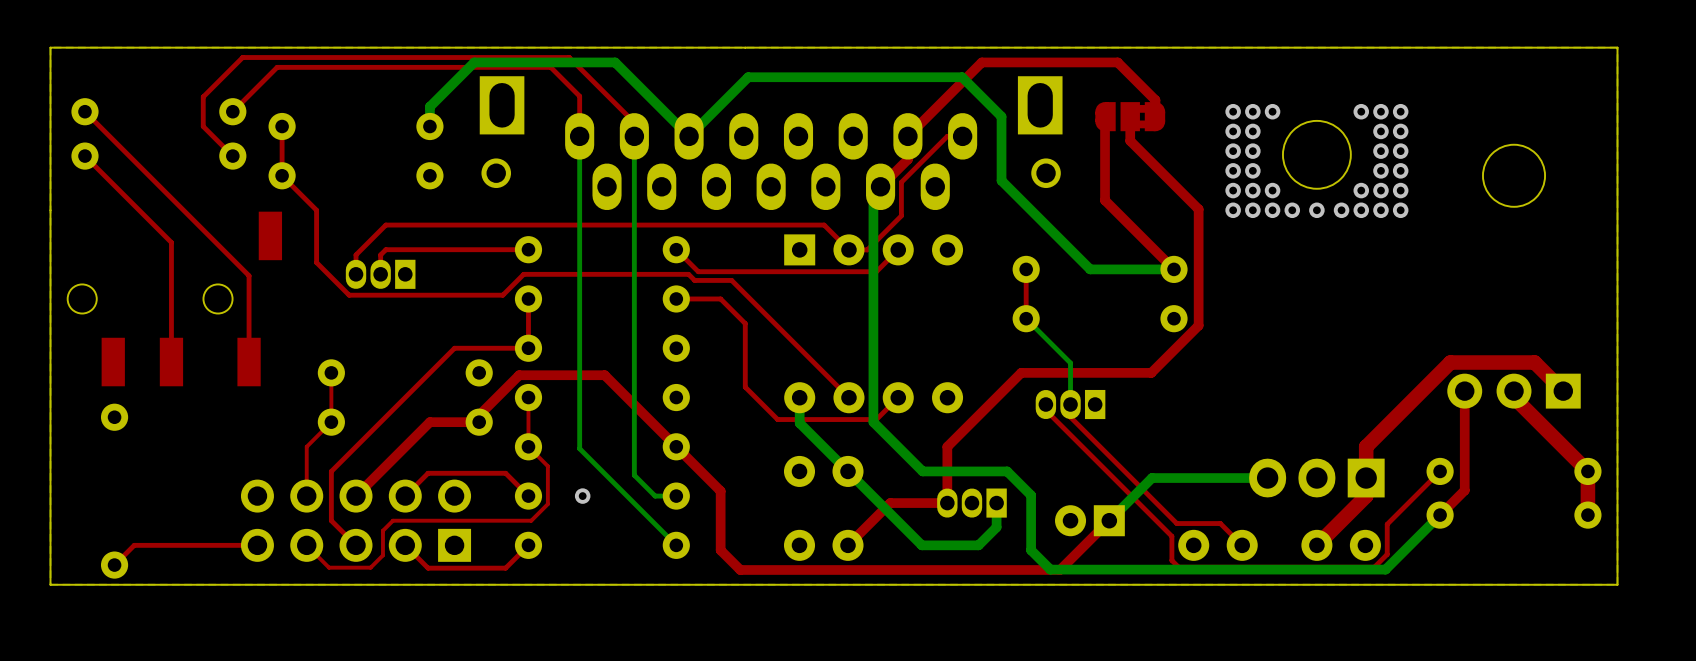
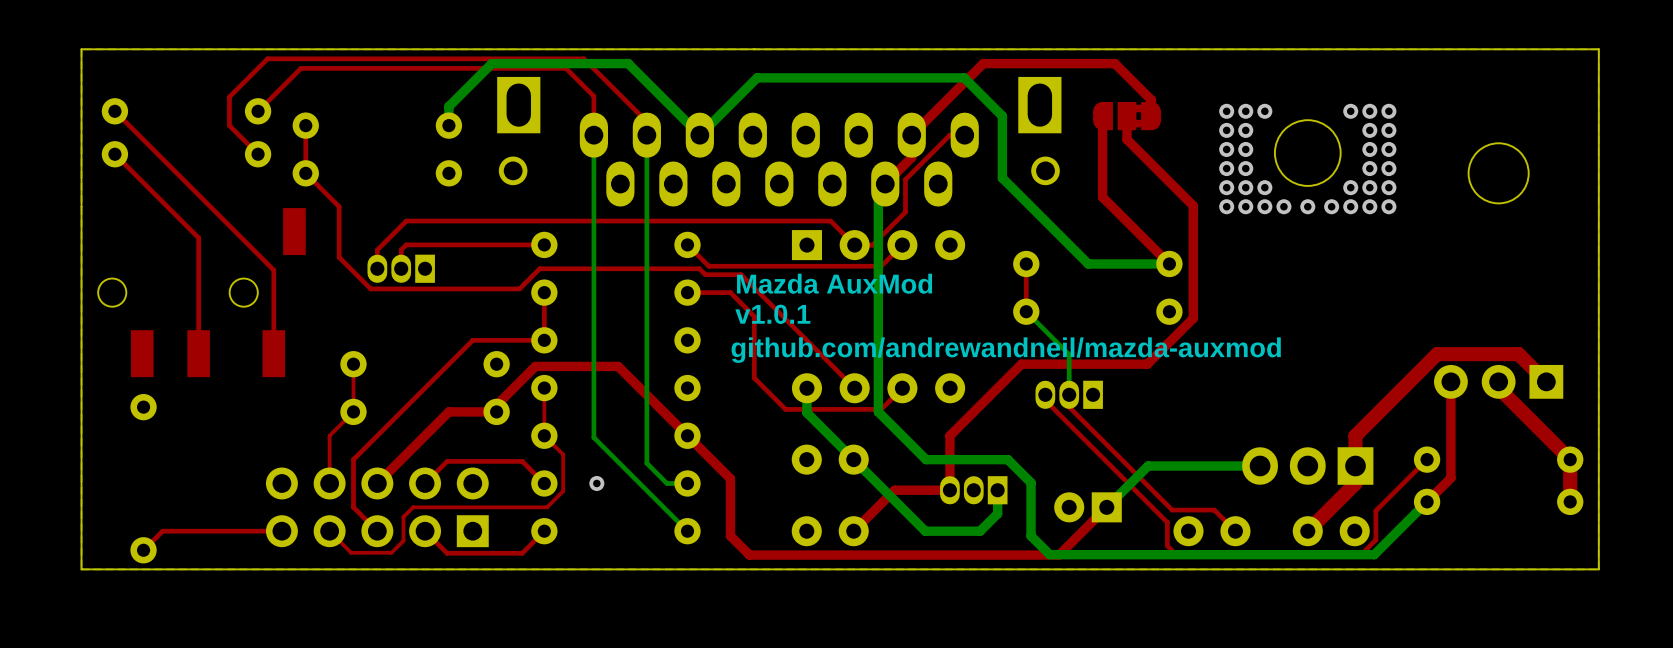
text: none -> Mazda AuxMod (834, 283)
text: none -> v1.0.1 (772, 314)
text: none -> github.com/andrewandneil/mazda-auxmod (1006, 350)

